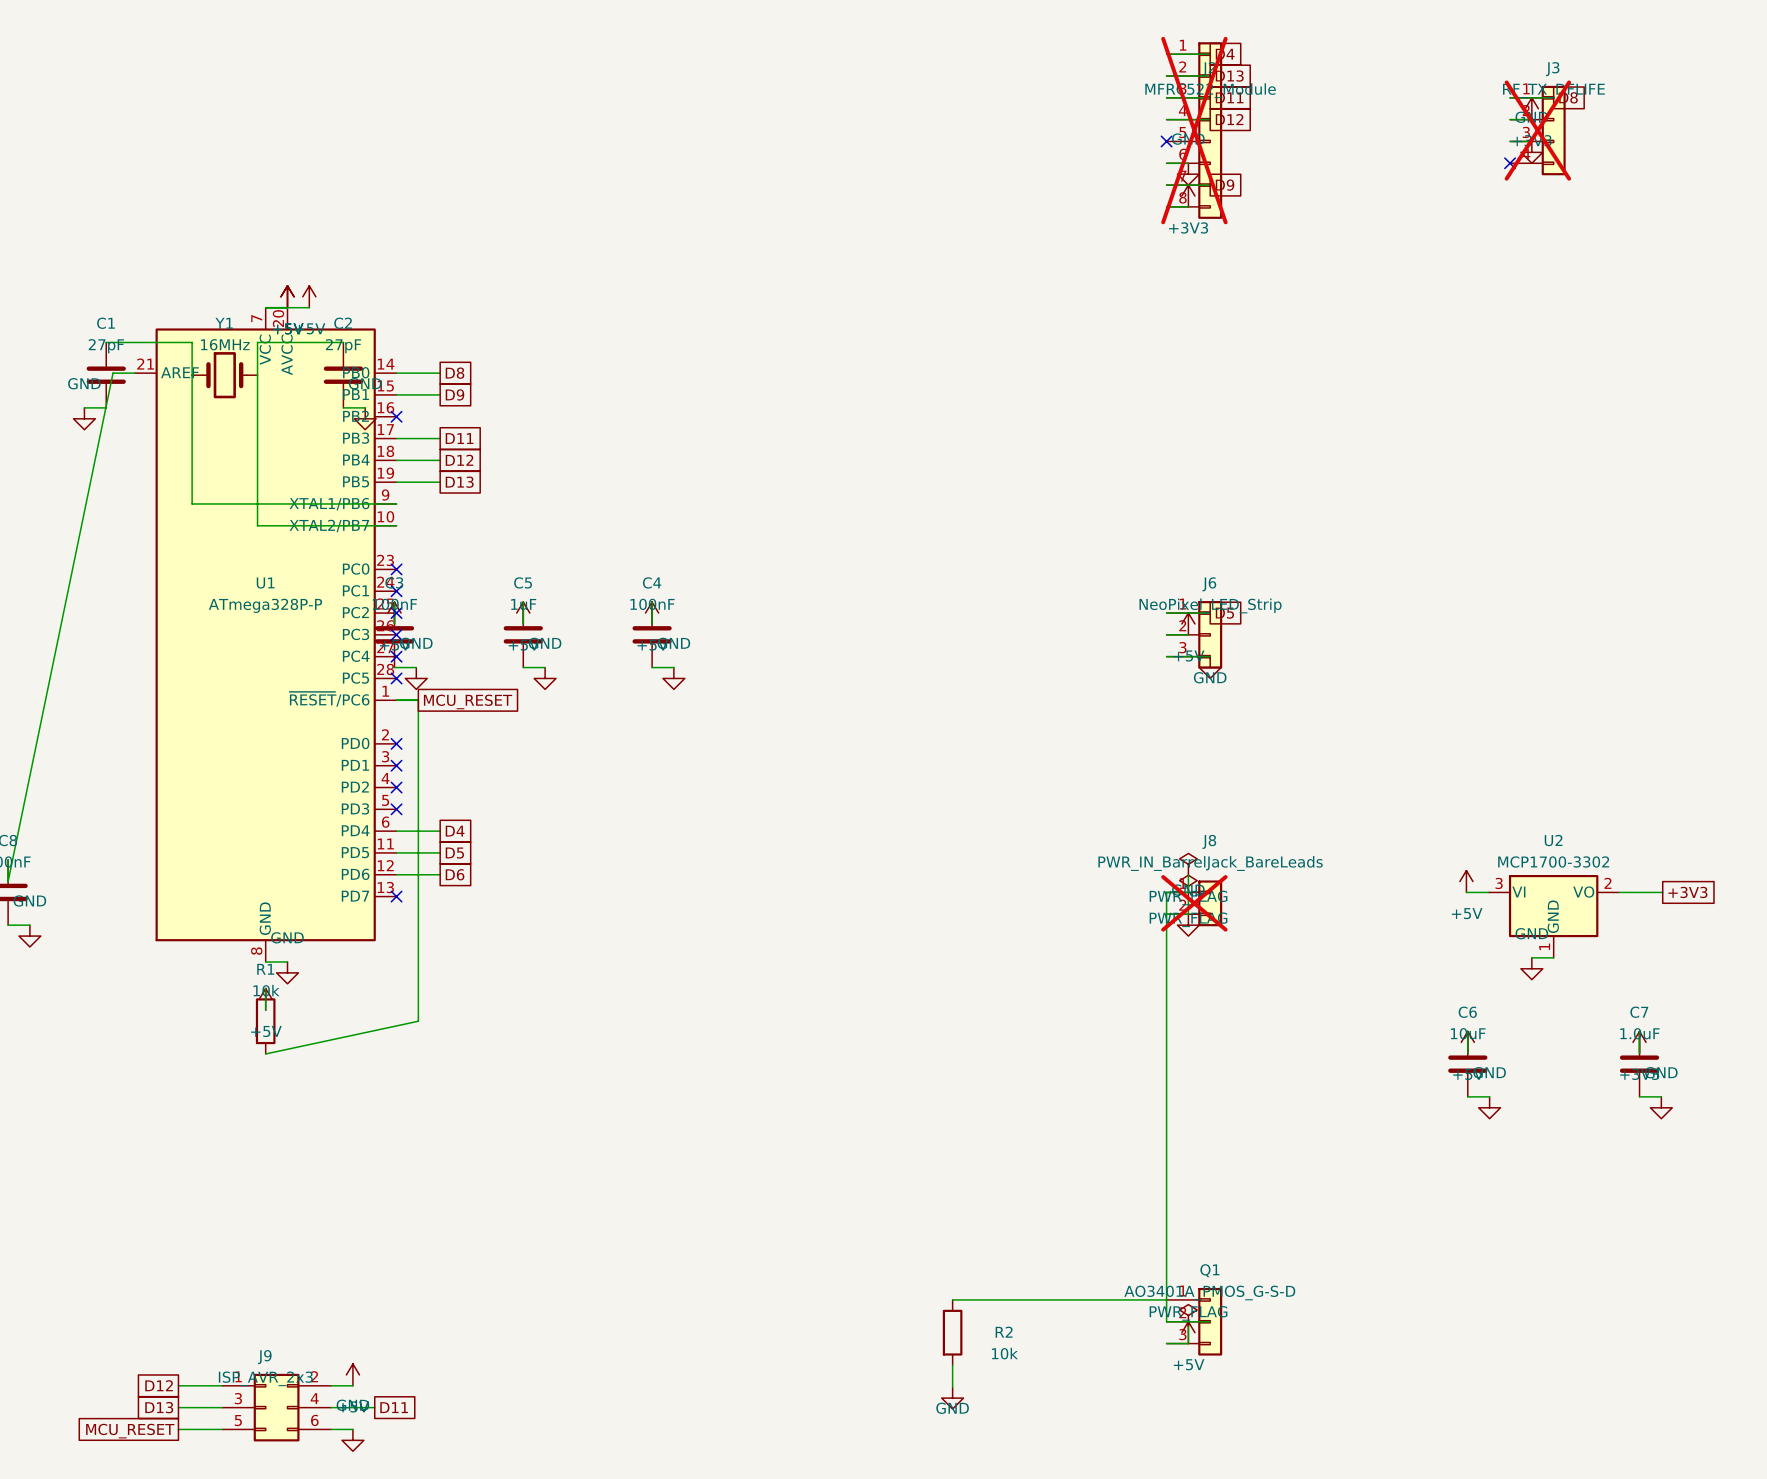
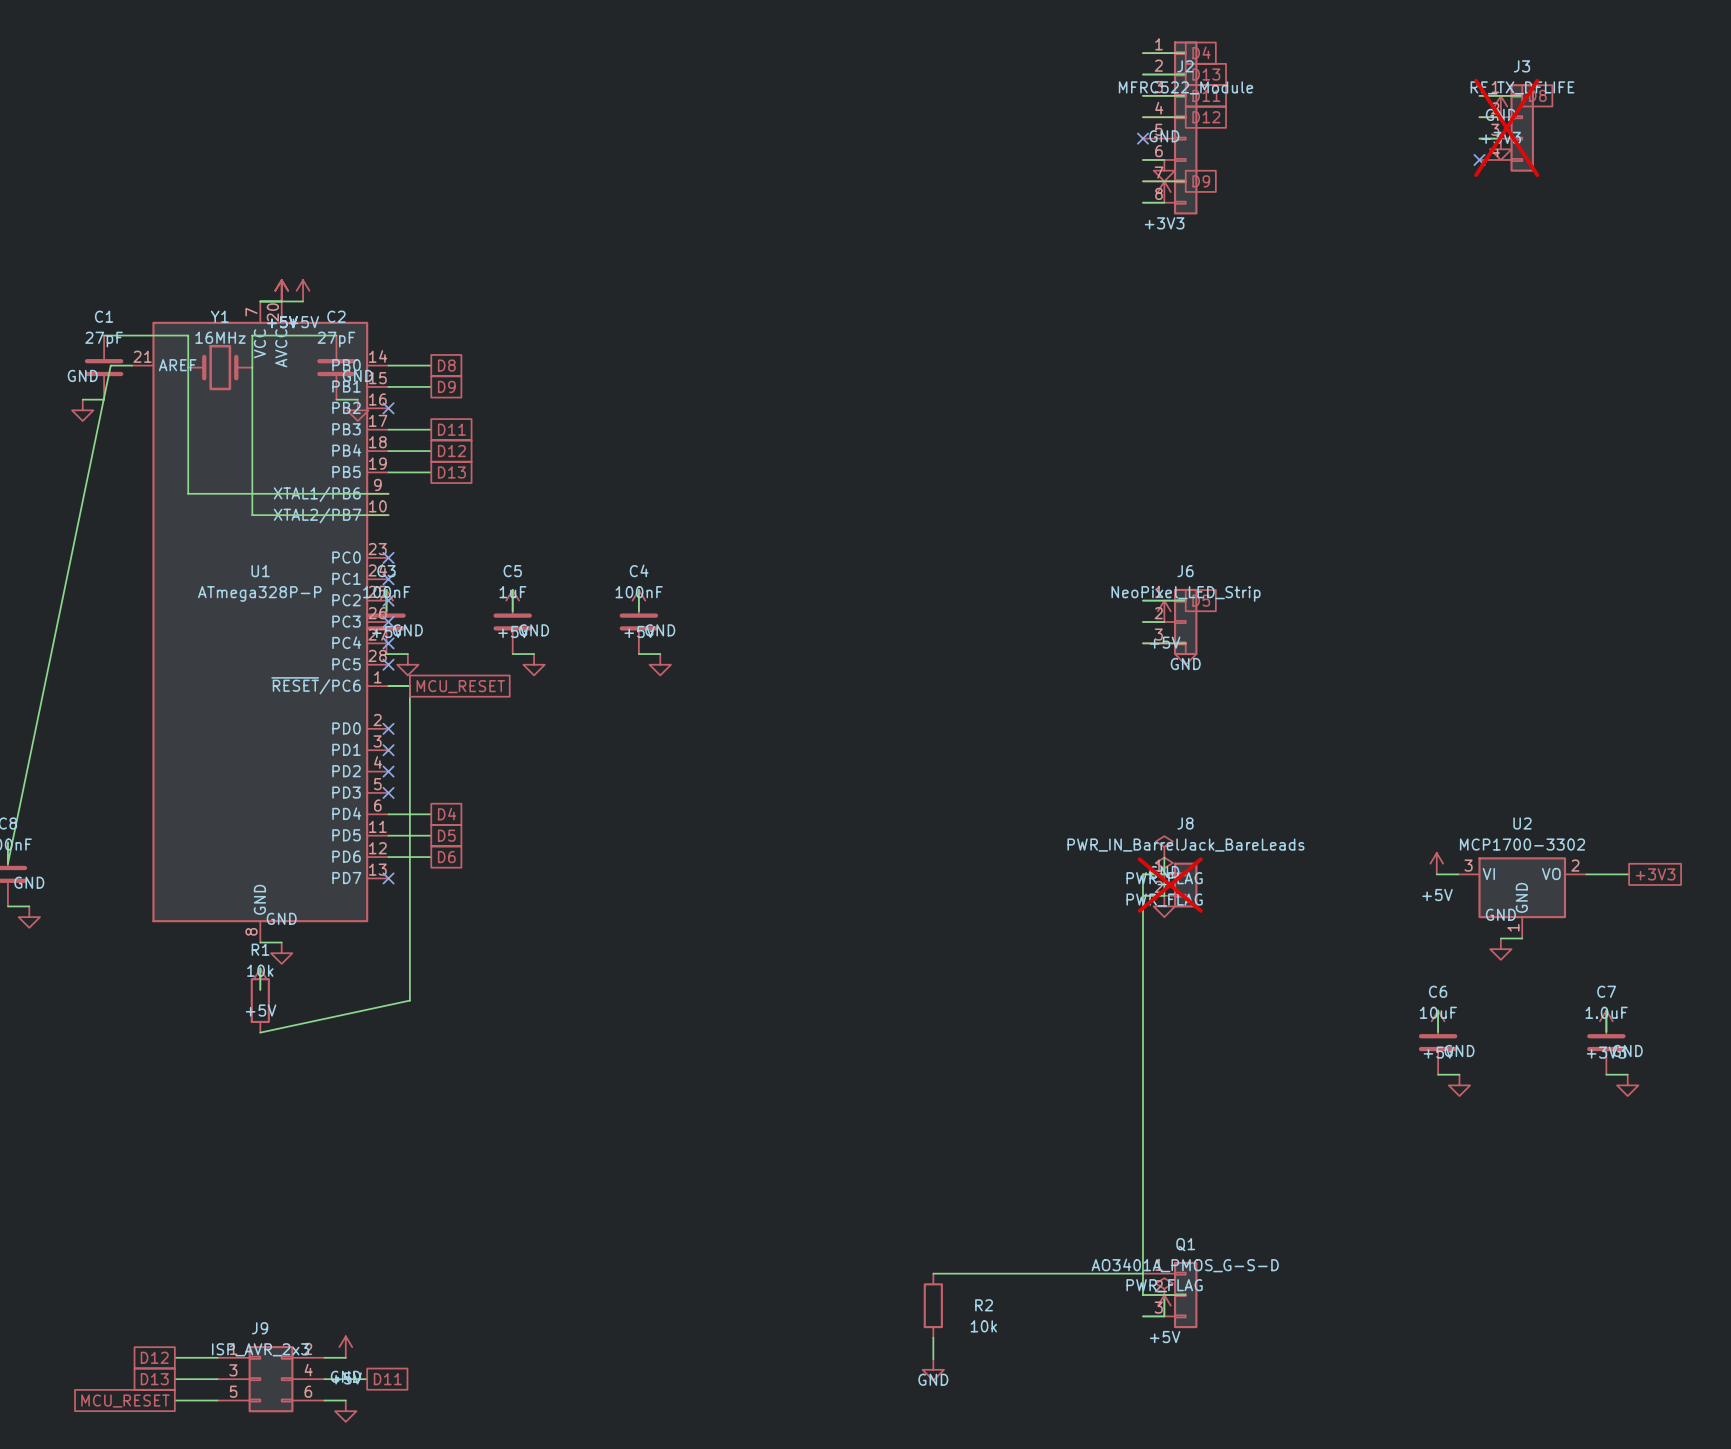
J2 do-not-place cross: (1194, 130) -> none

